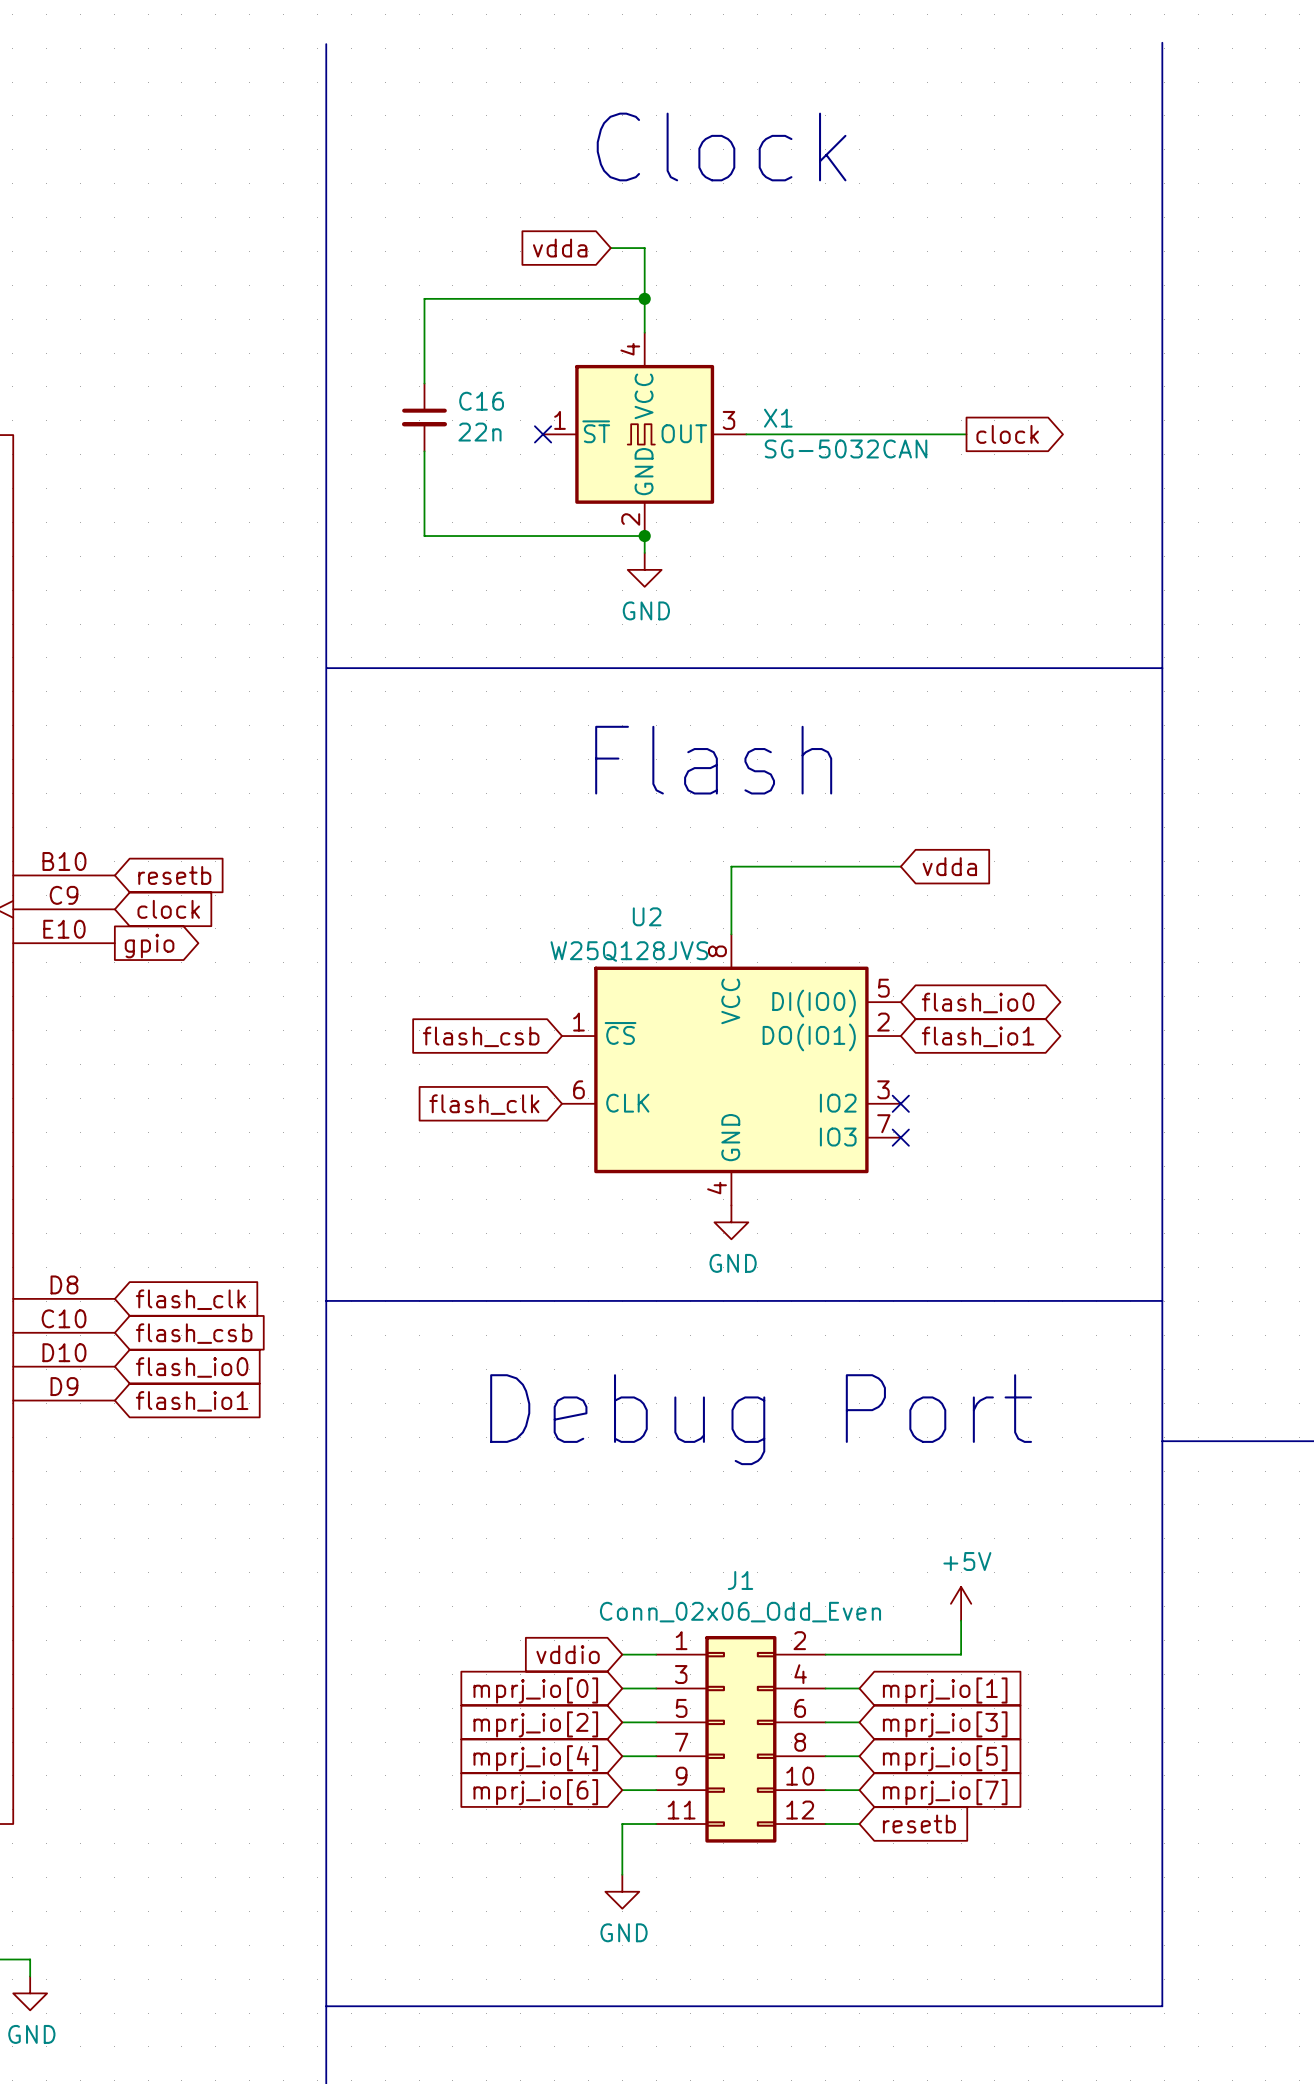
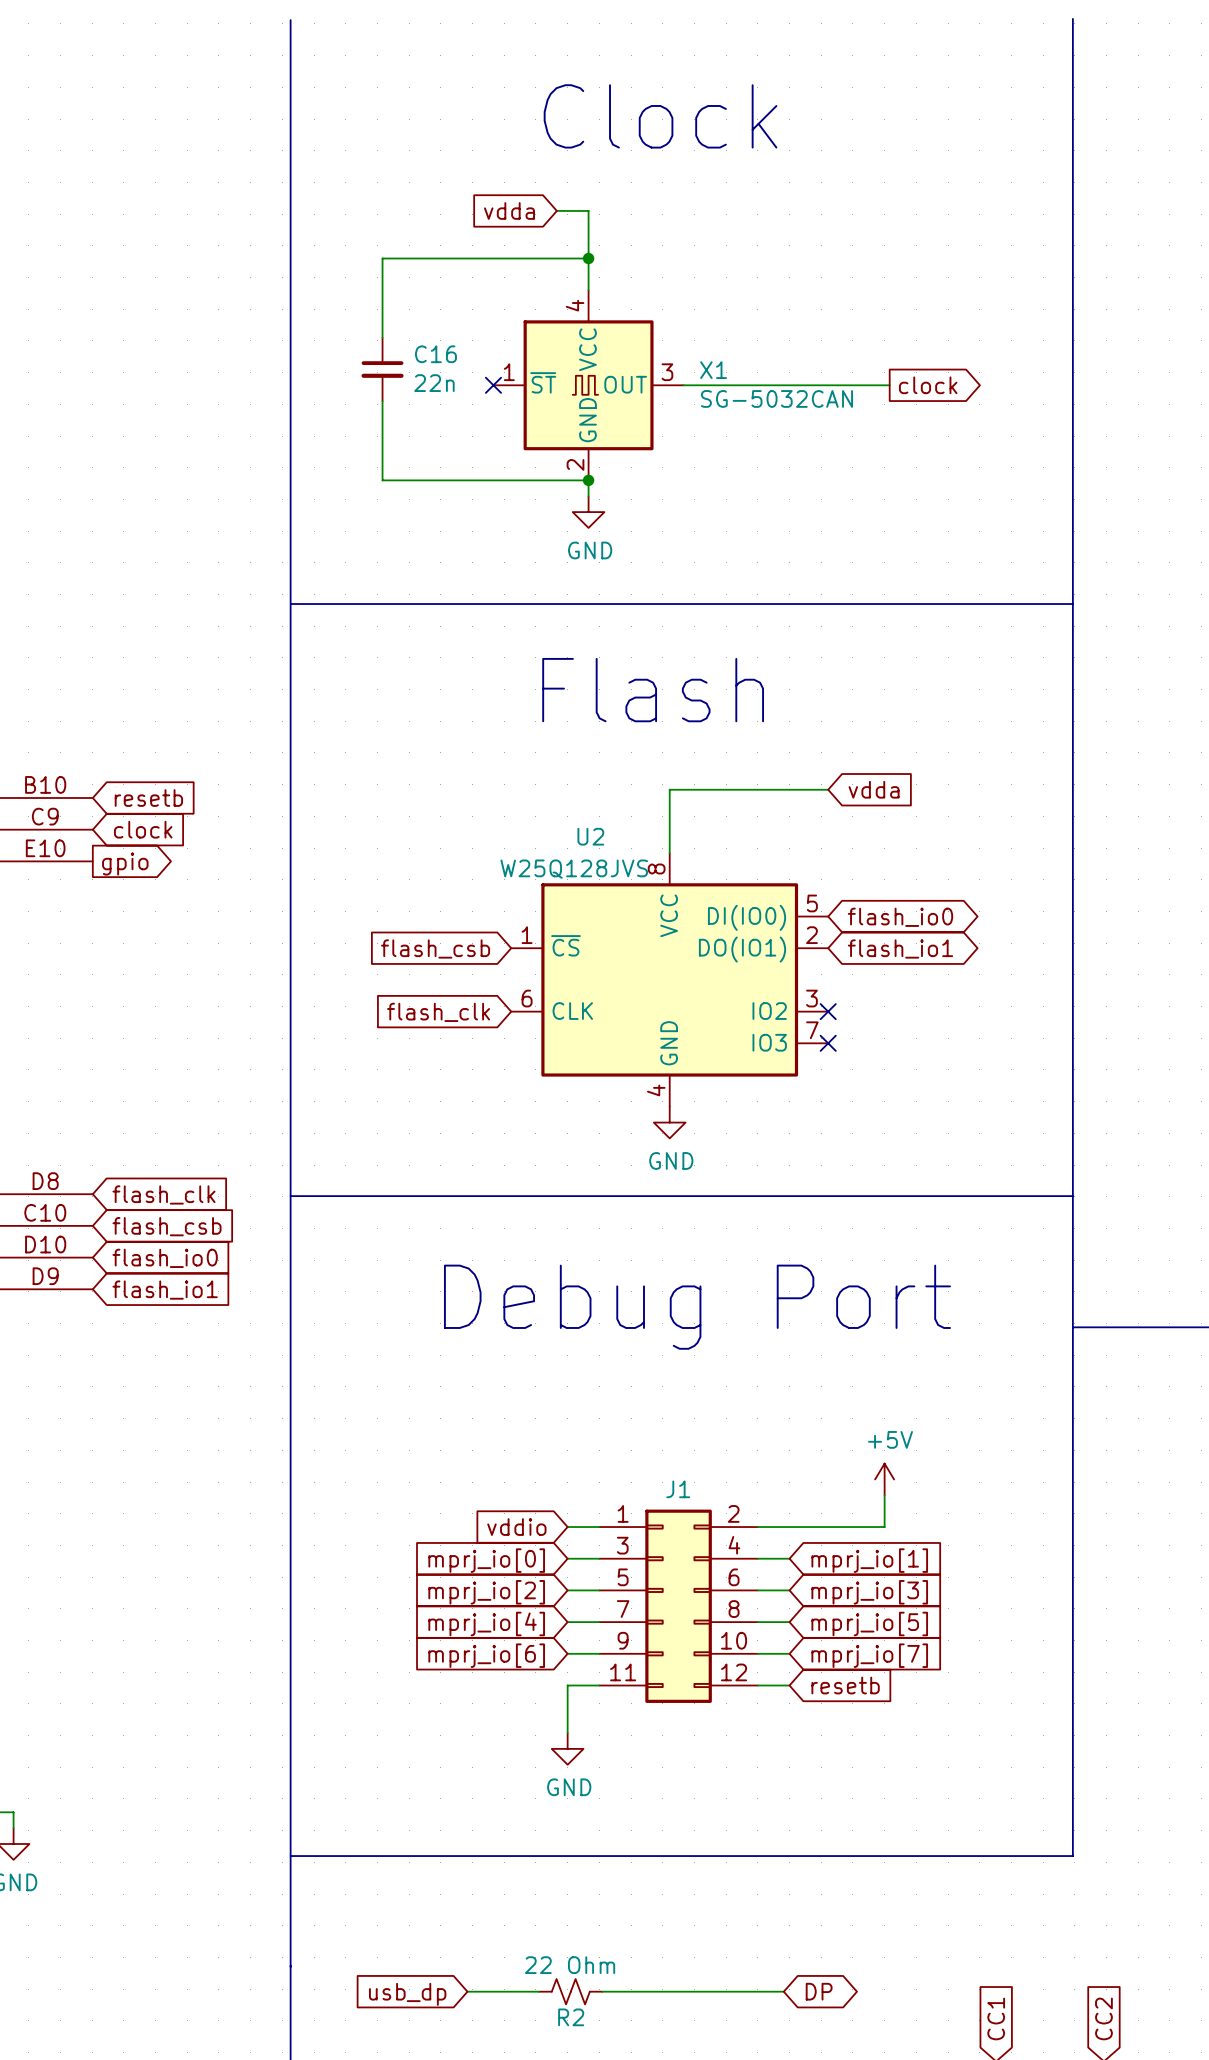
J1 name position: J1 (740, 1580) -> J1 (678, 1489)
J1 value: Conn_02x06_Odd_Even (740, 1612) -> none

